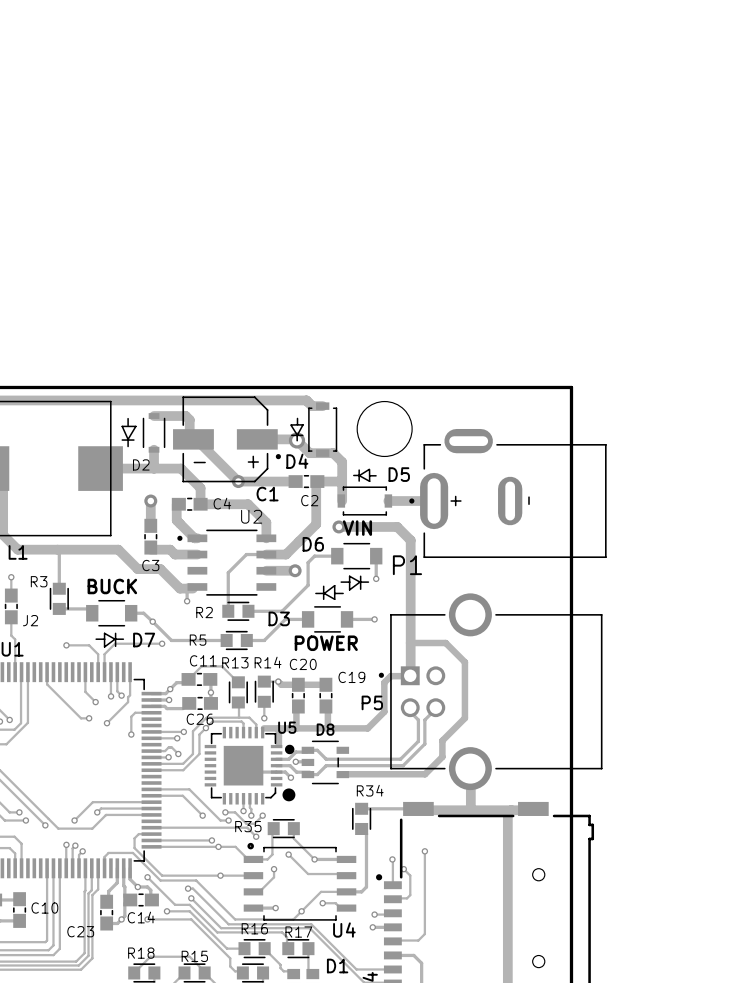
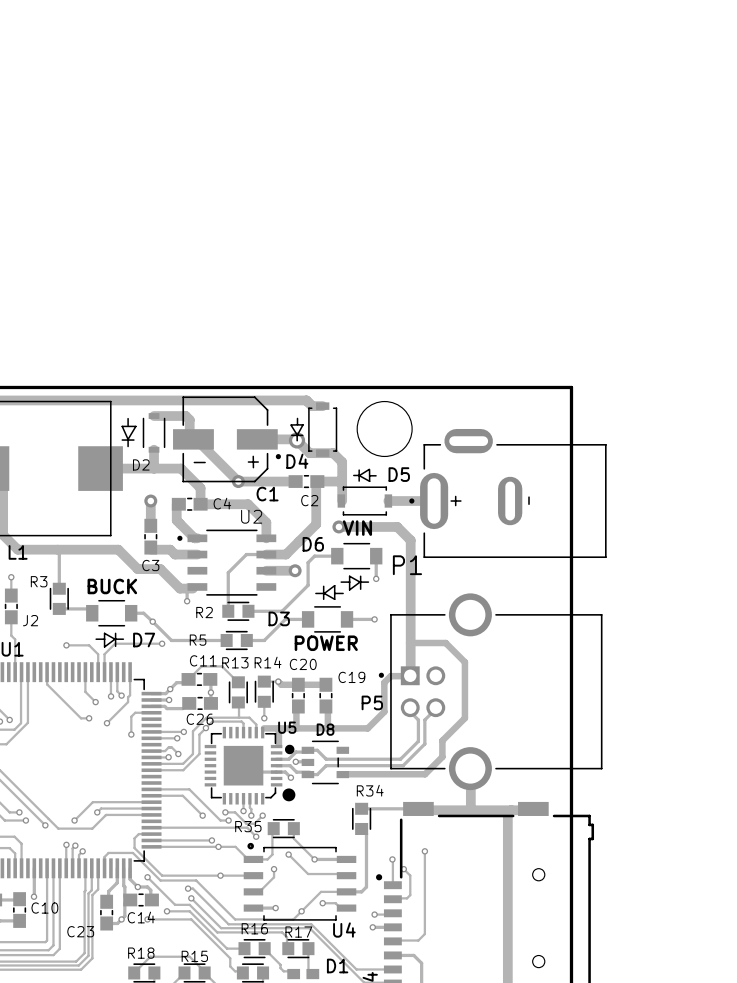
track: none -> (34, 868) (34, 896)
via: none -> (34, 896)

